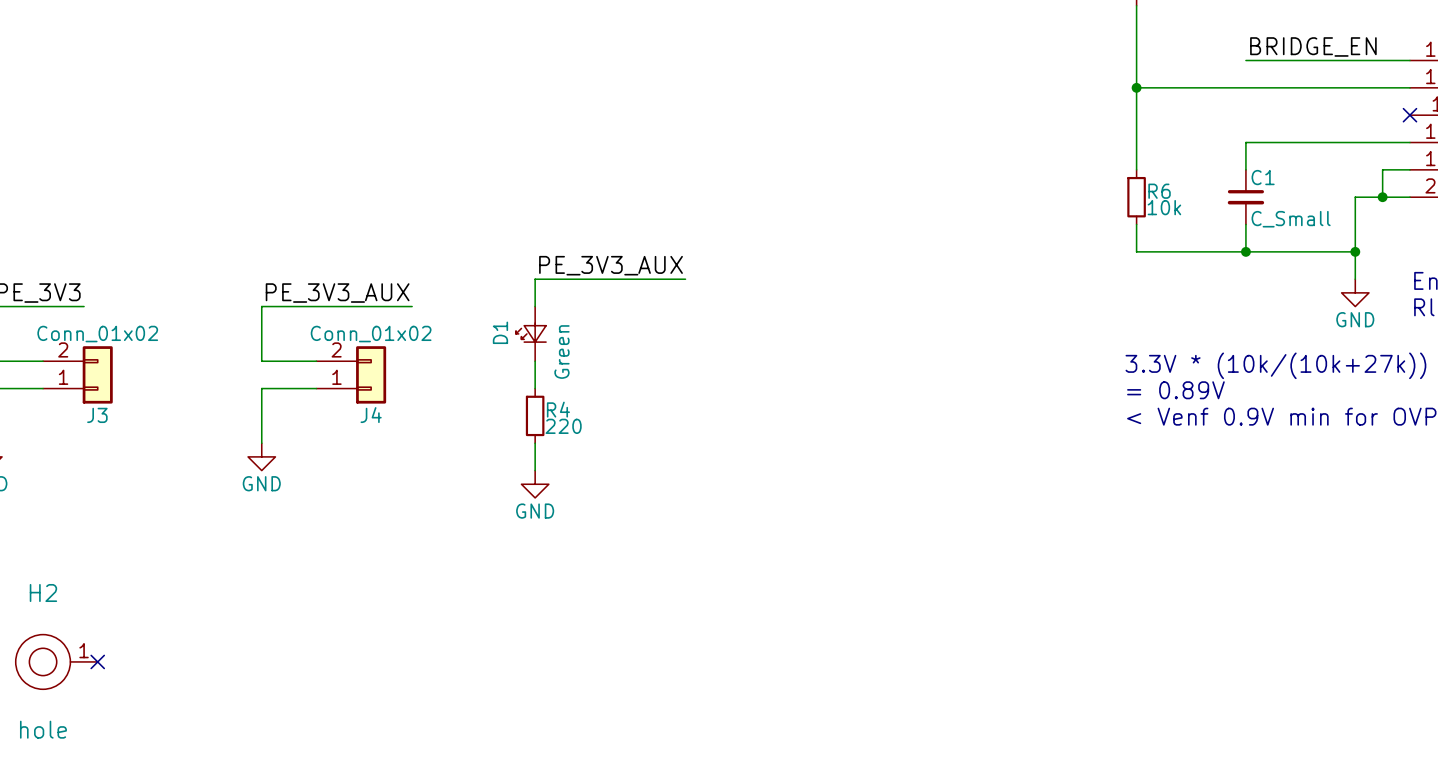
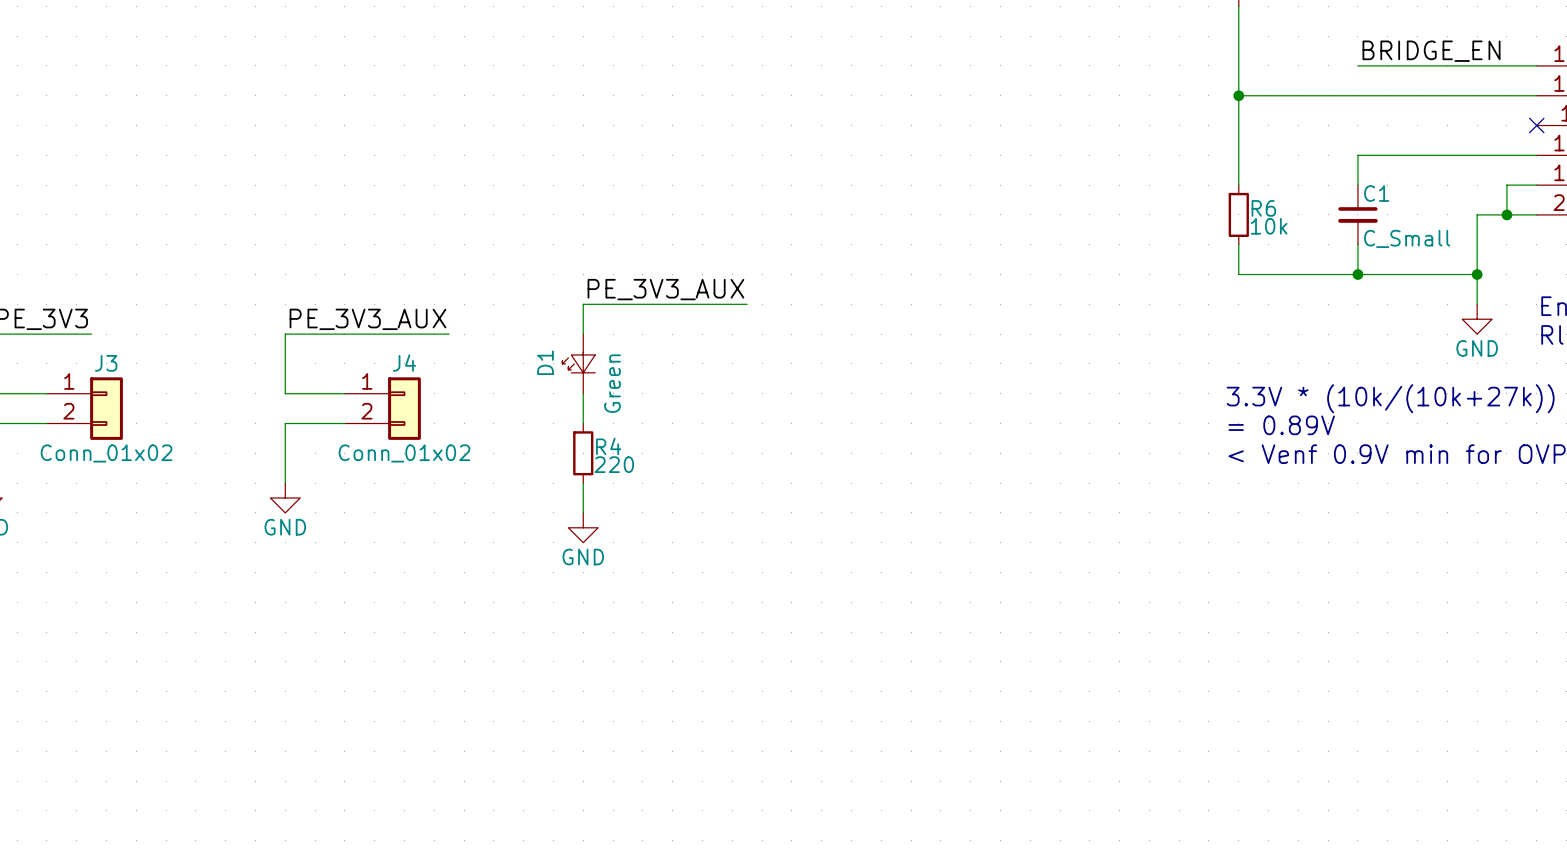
J3 flip: as is (97, 374) -> up-down (106, 408)
J4 flip: as is (371, 374) -> up-down (404, 408)
H2: hole (56, 661) -> none
no-connect mark: (97, 661) -> none

